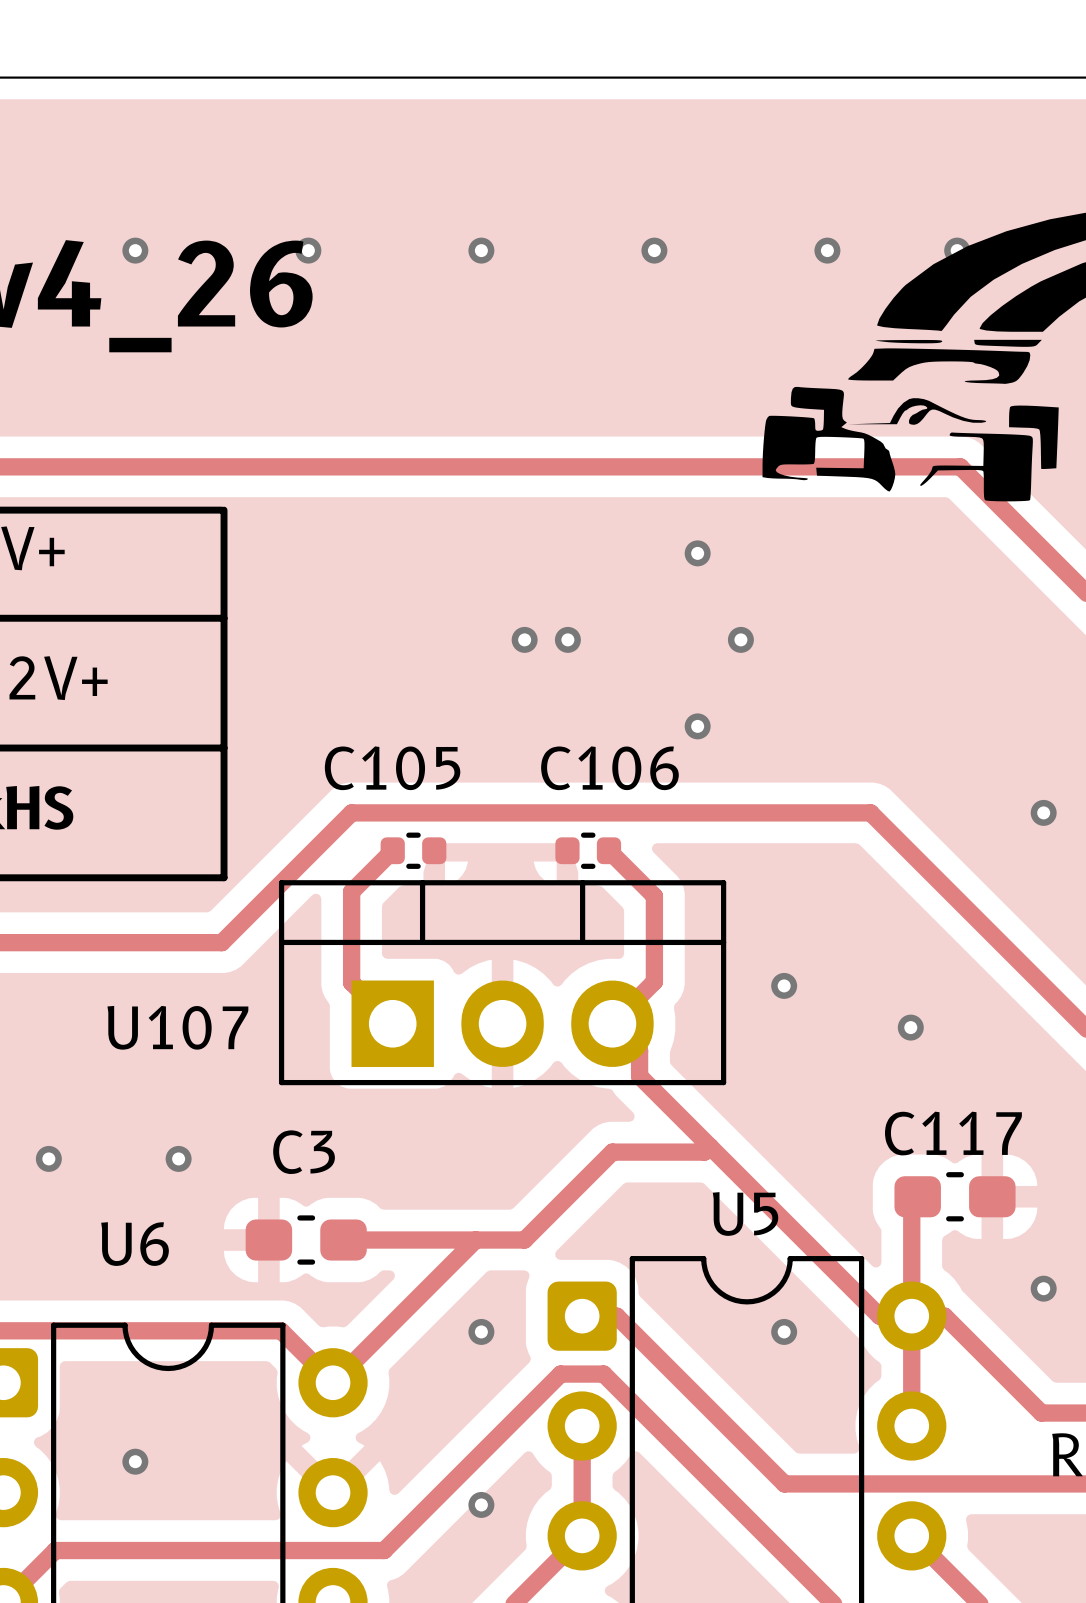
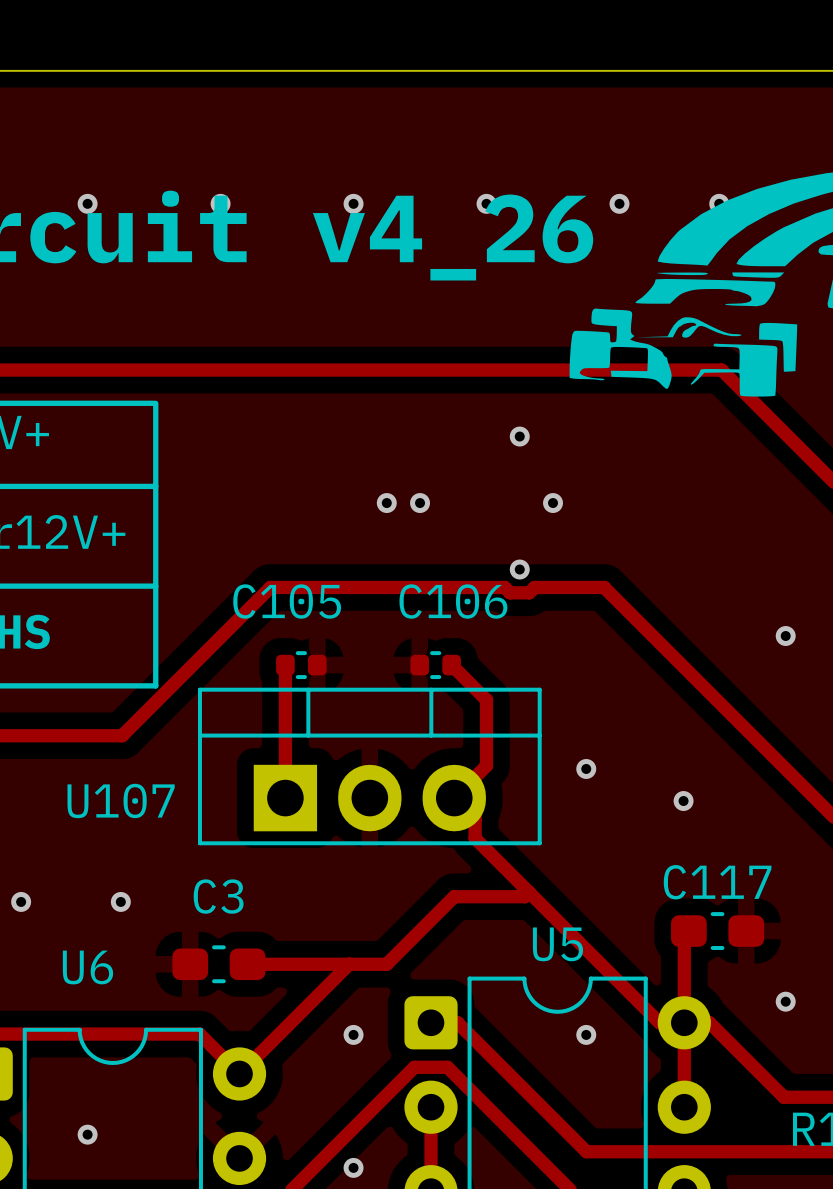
track: (870, 812) (351, 812) (221, 942) (180, 942) -> (652, 636) (604, 587) (534, 587) (529, 592) (510, 592) (504, 587) (270, 587) (122, 735)
track: (392, 850) (351, 891) (351, 982) (392, 1023) -> (285, 665) (285, 798)

